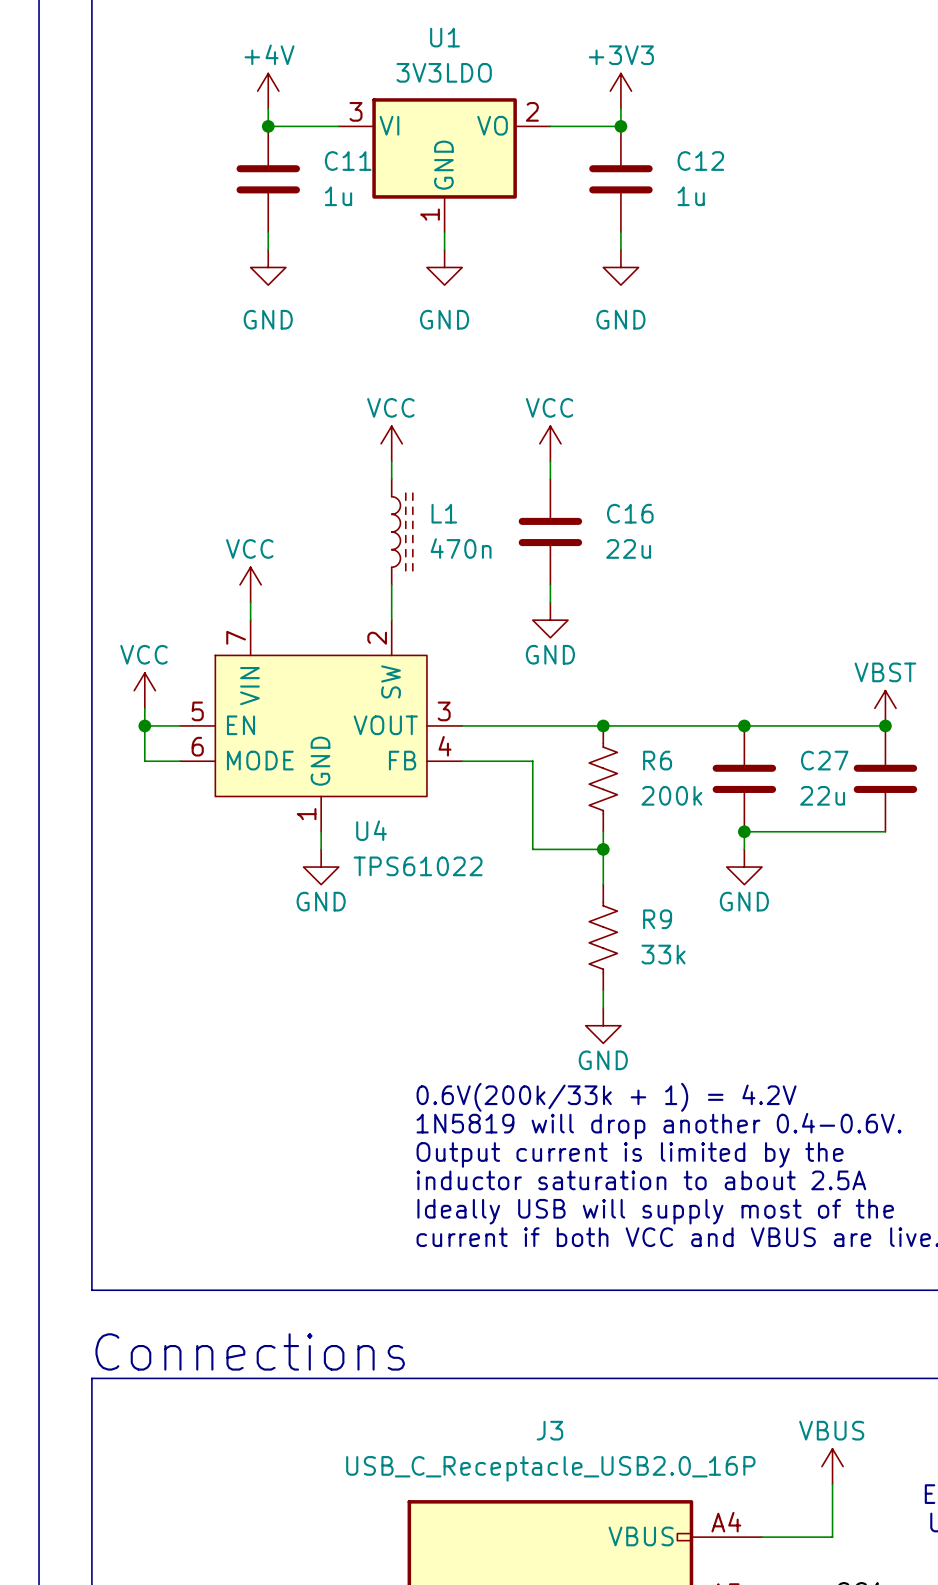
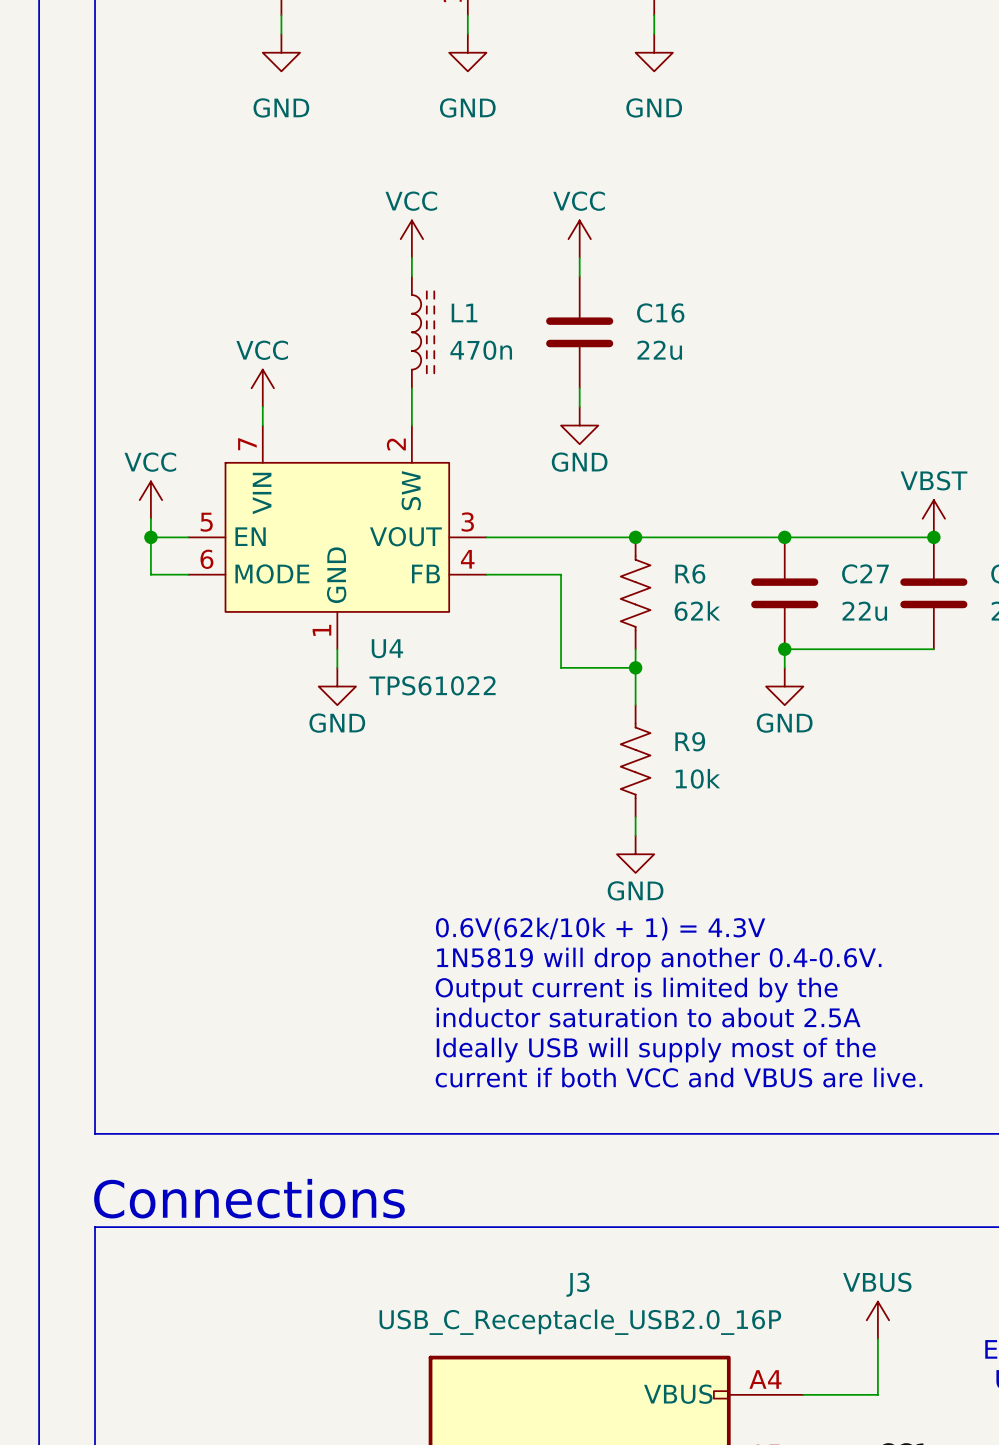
R6 value: 200k (671, 795) -> 62k (697, 611)
R9 value: 33k (663, 954) -> 10k (697, 778)
text: 0.6V(200k/33k + 1) = 4.2V (606, 1097) -> 0.6V(62k/10k + 1) = 4.3V (600, 929)

